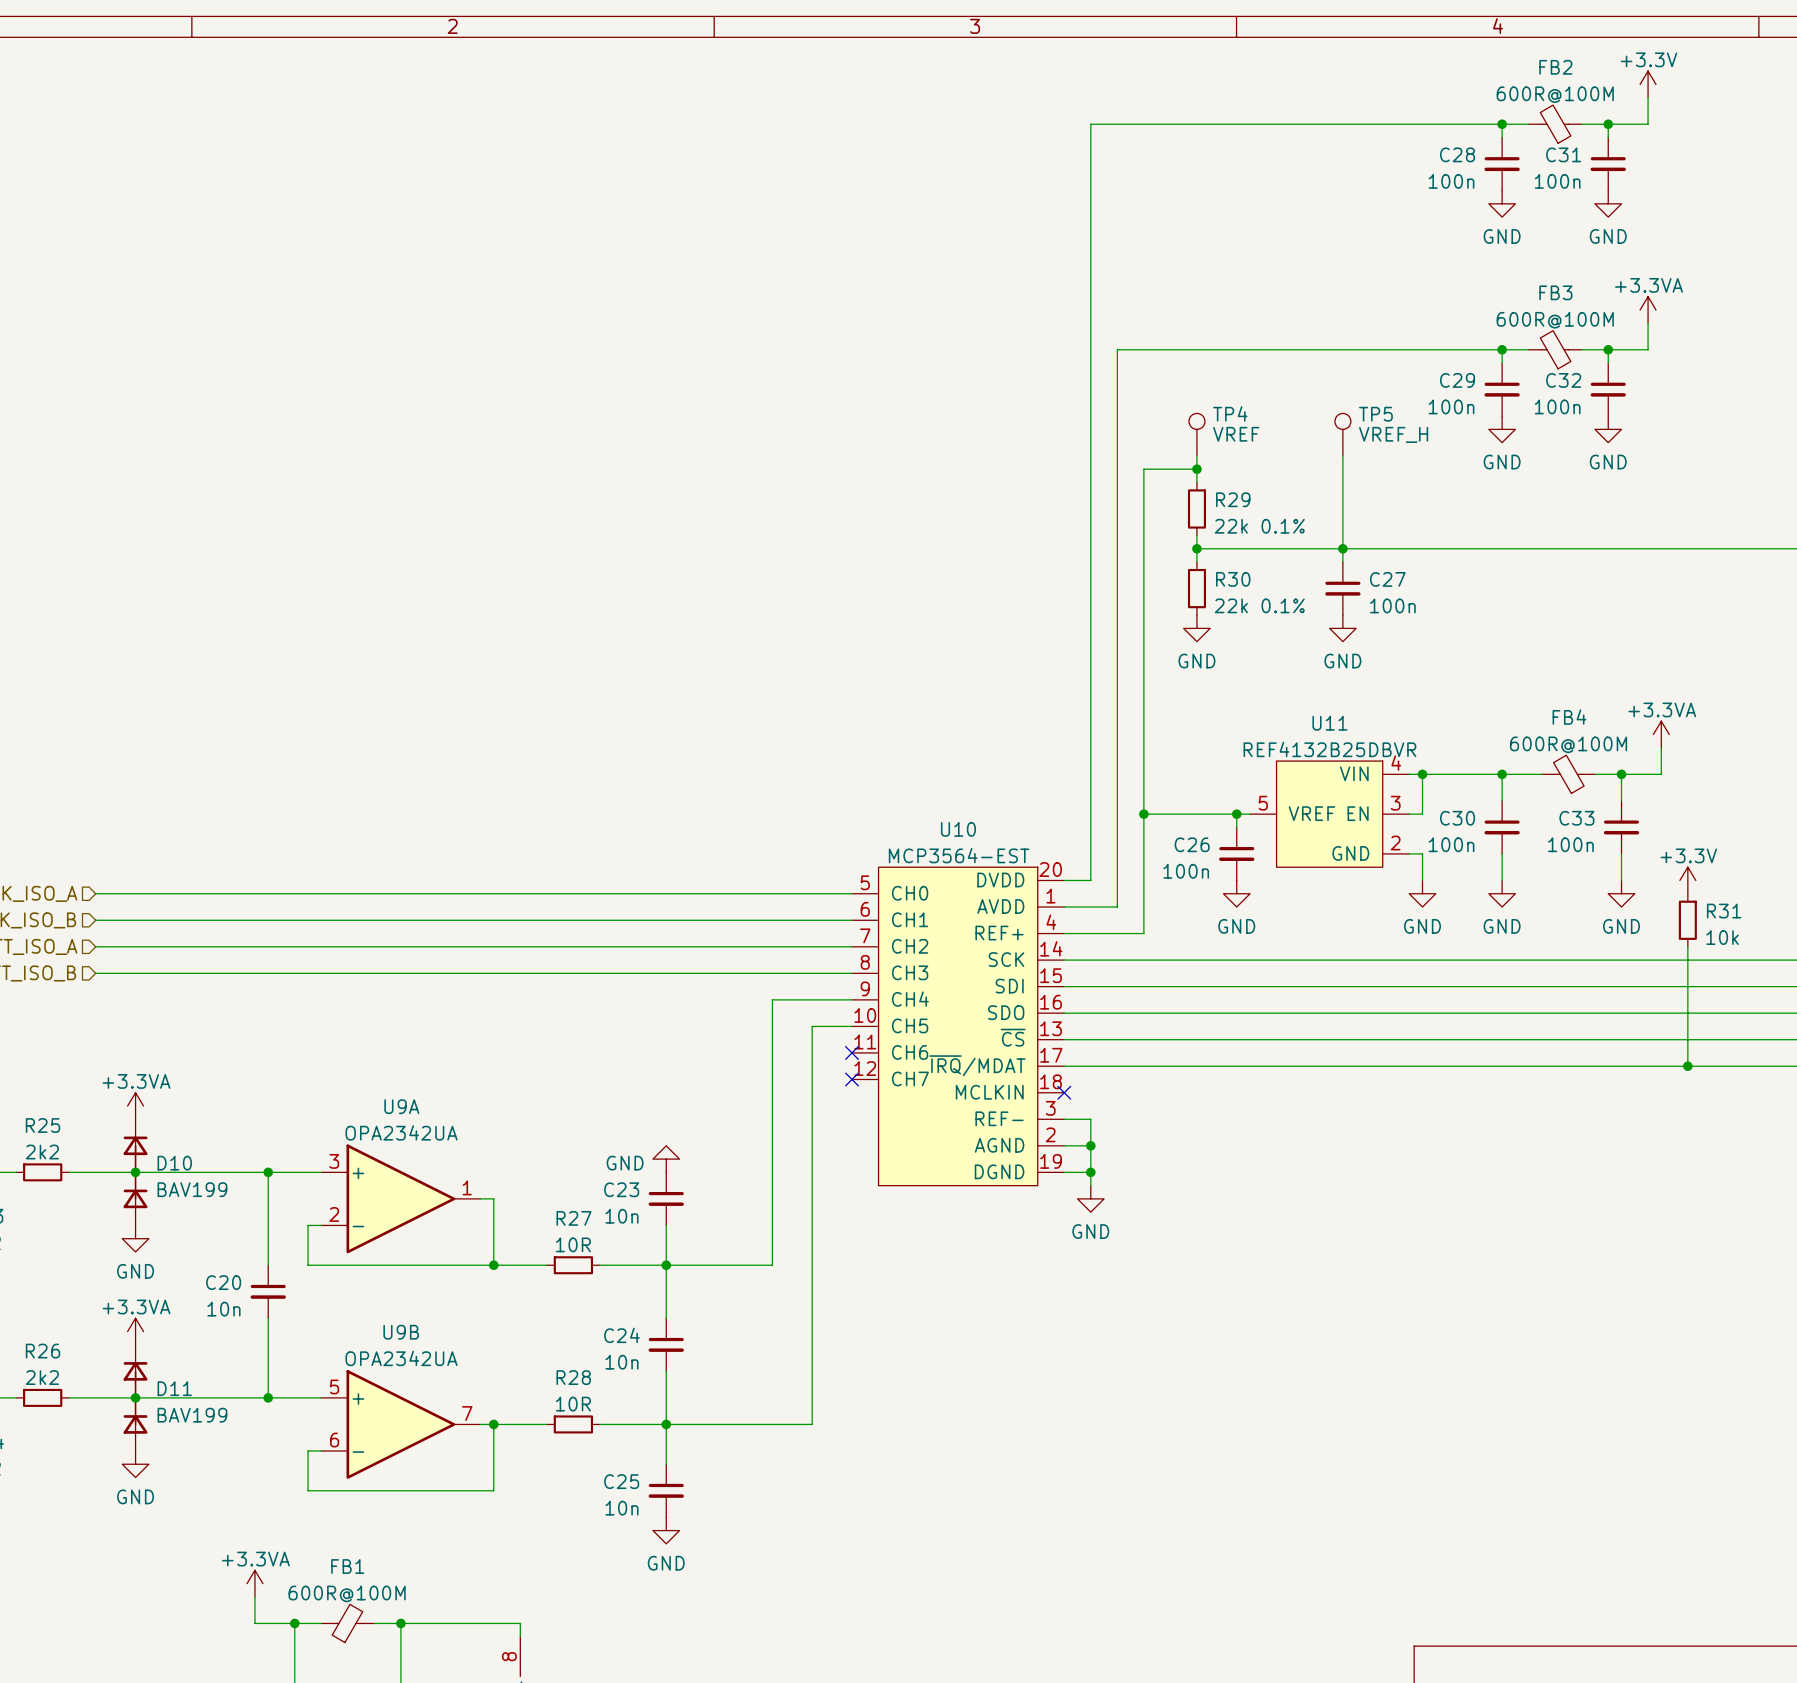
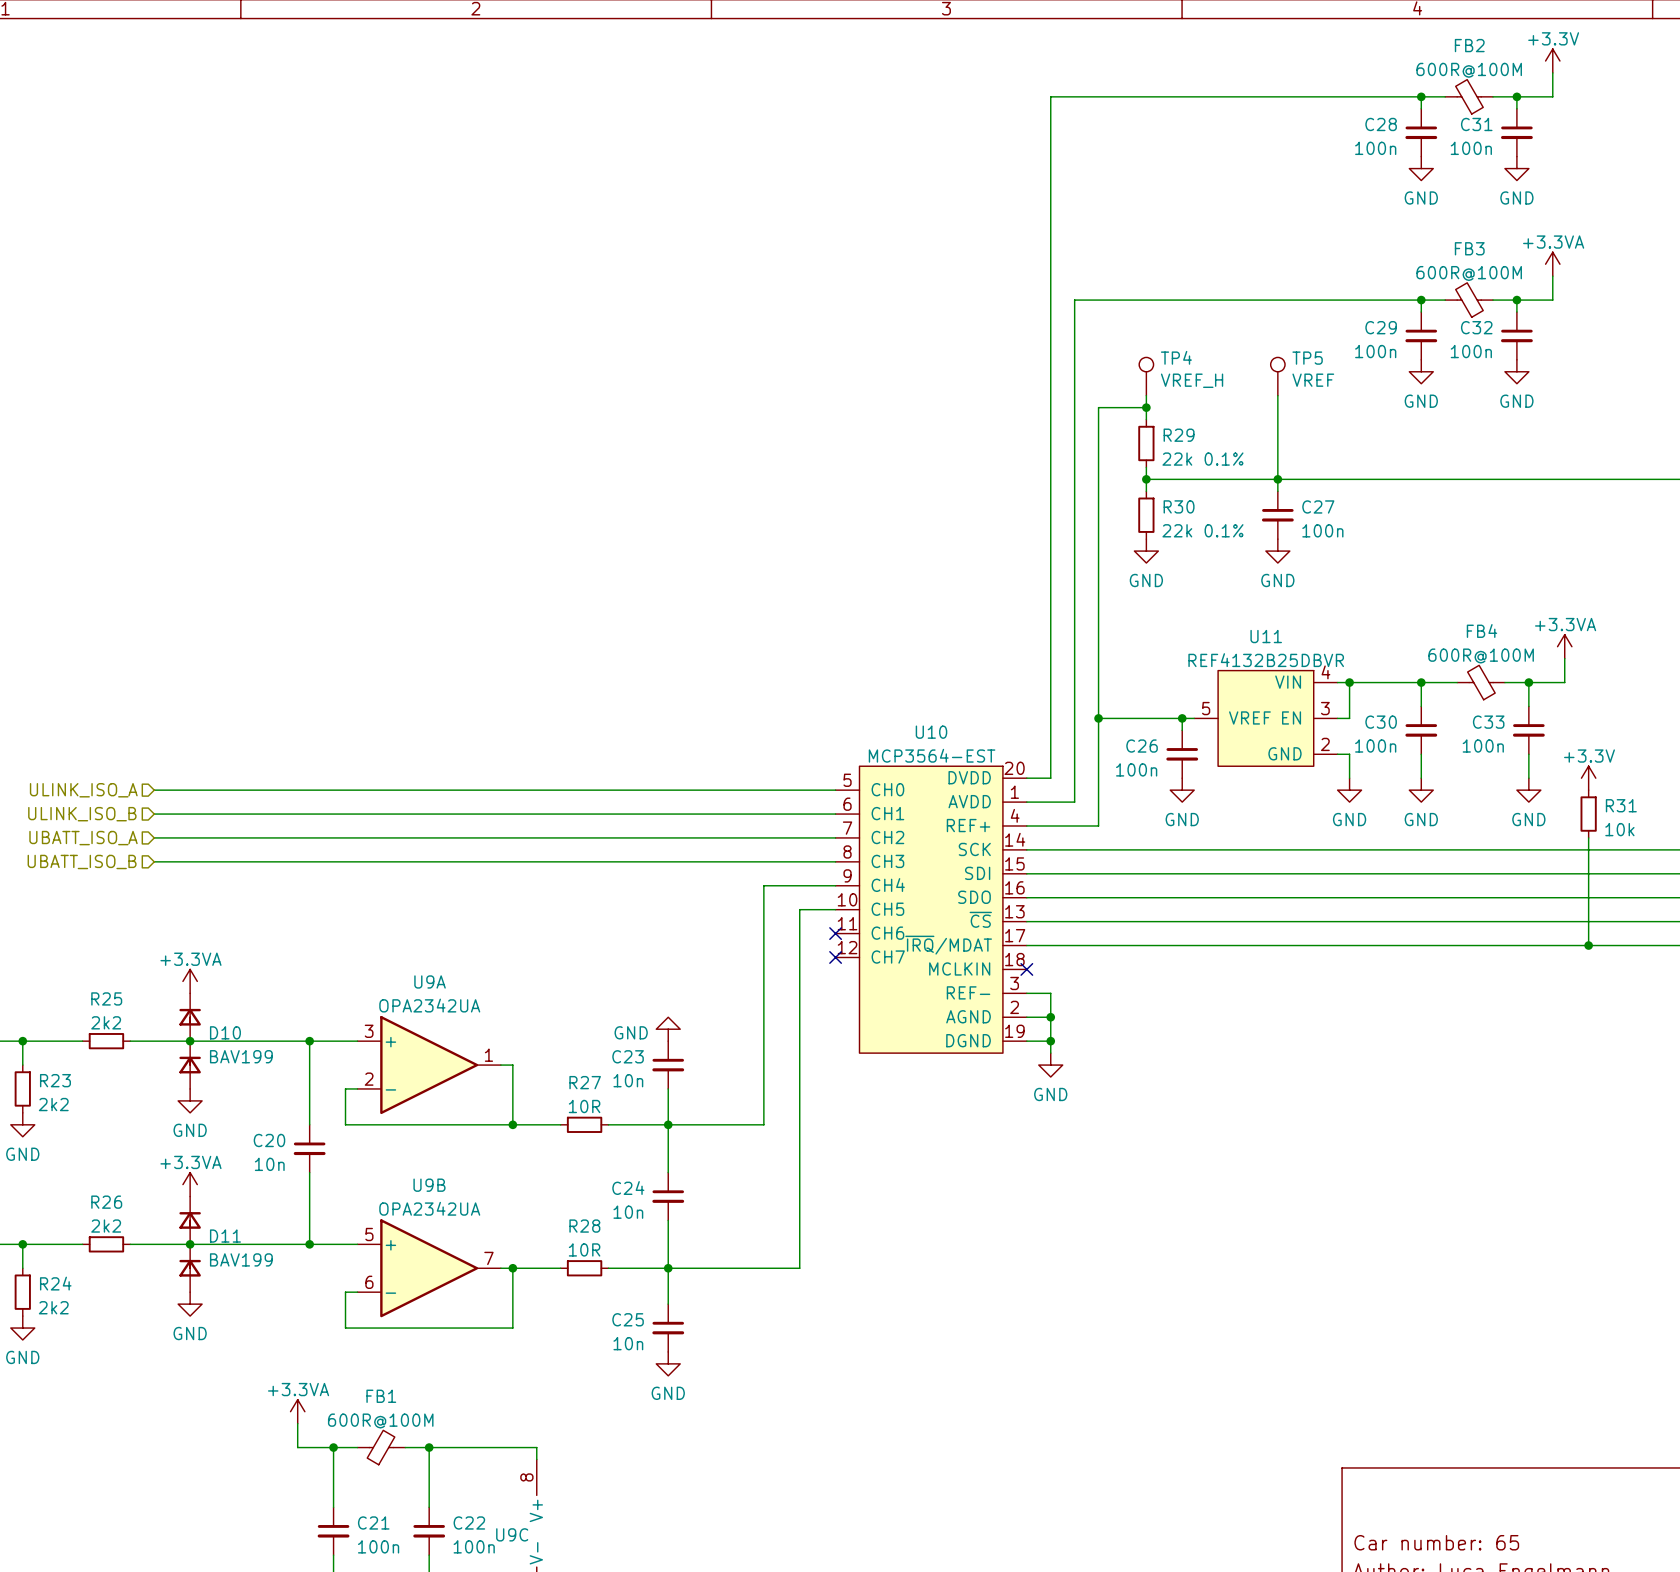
TP4 value: VREF (1236, 434) -> VREF_H (1192, 380)
TP5 value: VREF_H (1393, 434) -> VREF (1313, 380)

